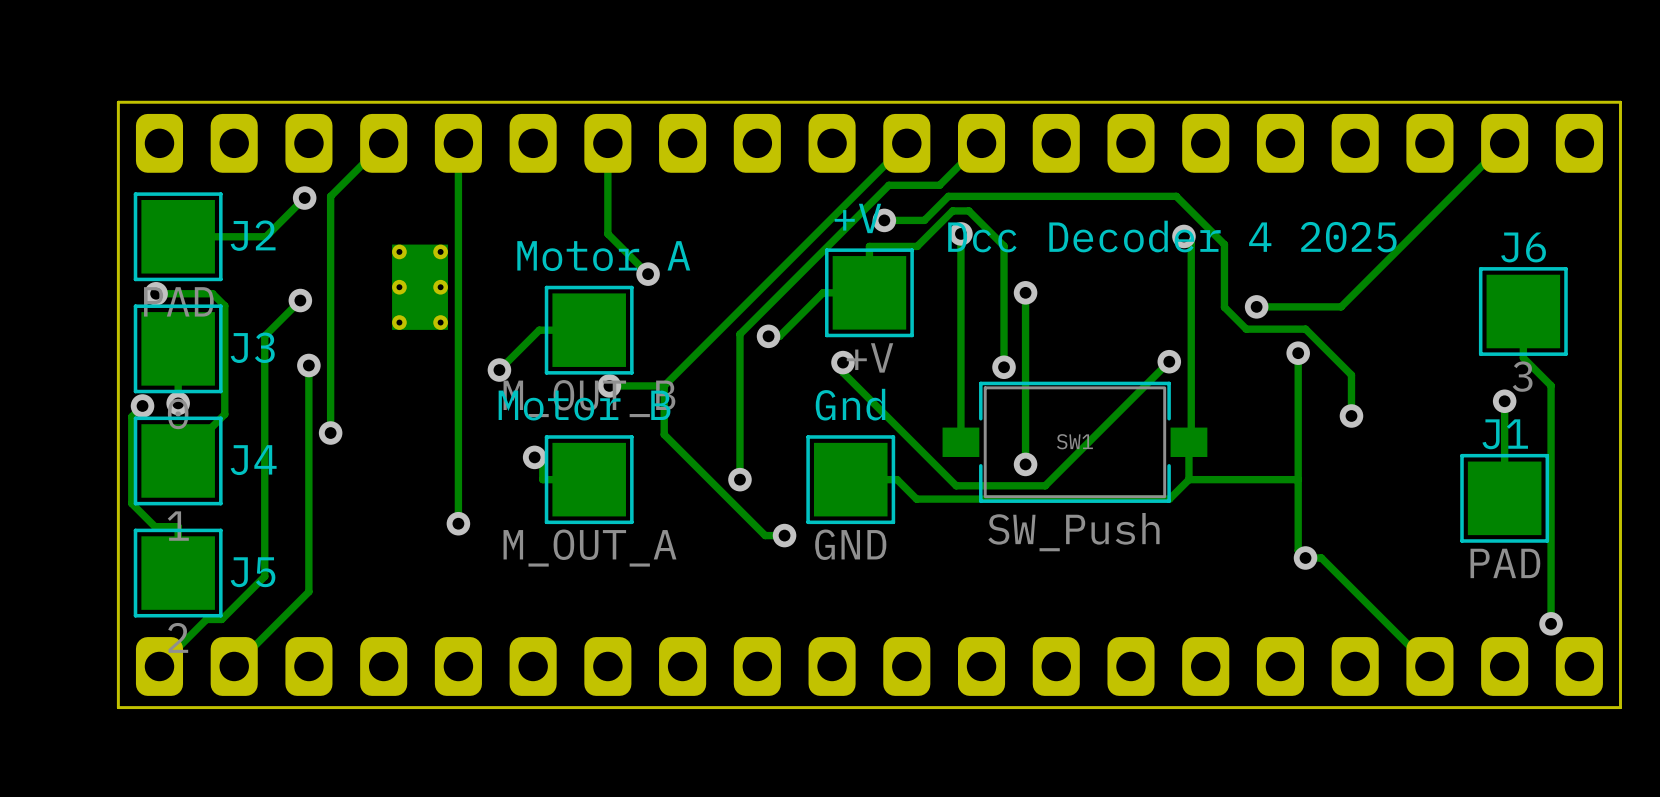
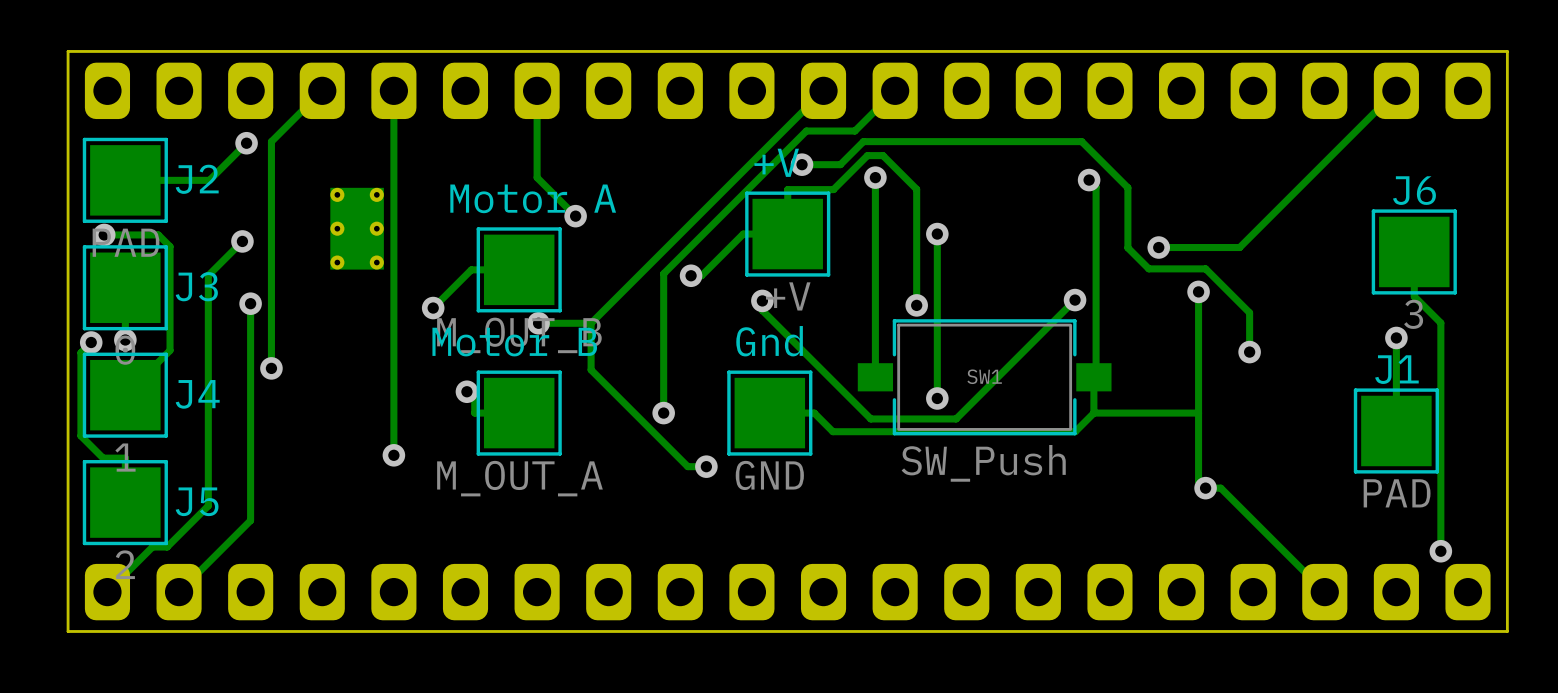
text: Dcc Decoder 4 2025 (1172, 236) -> none

